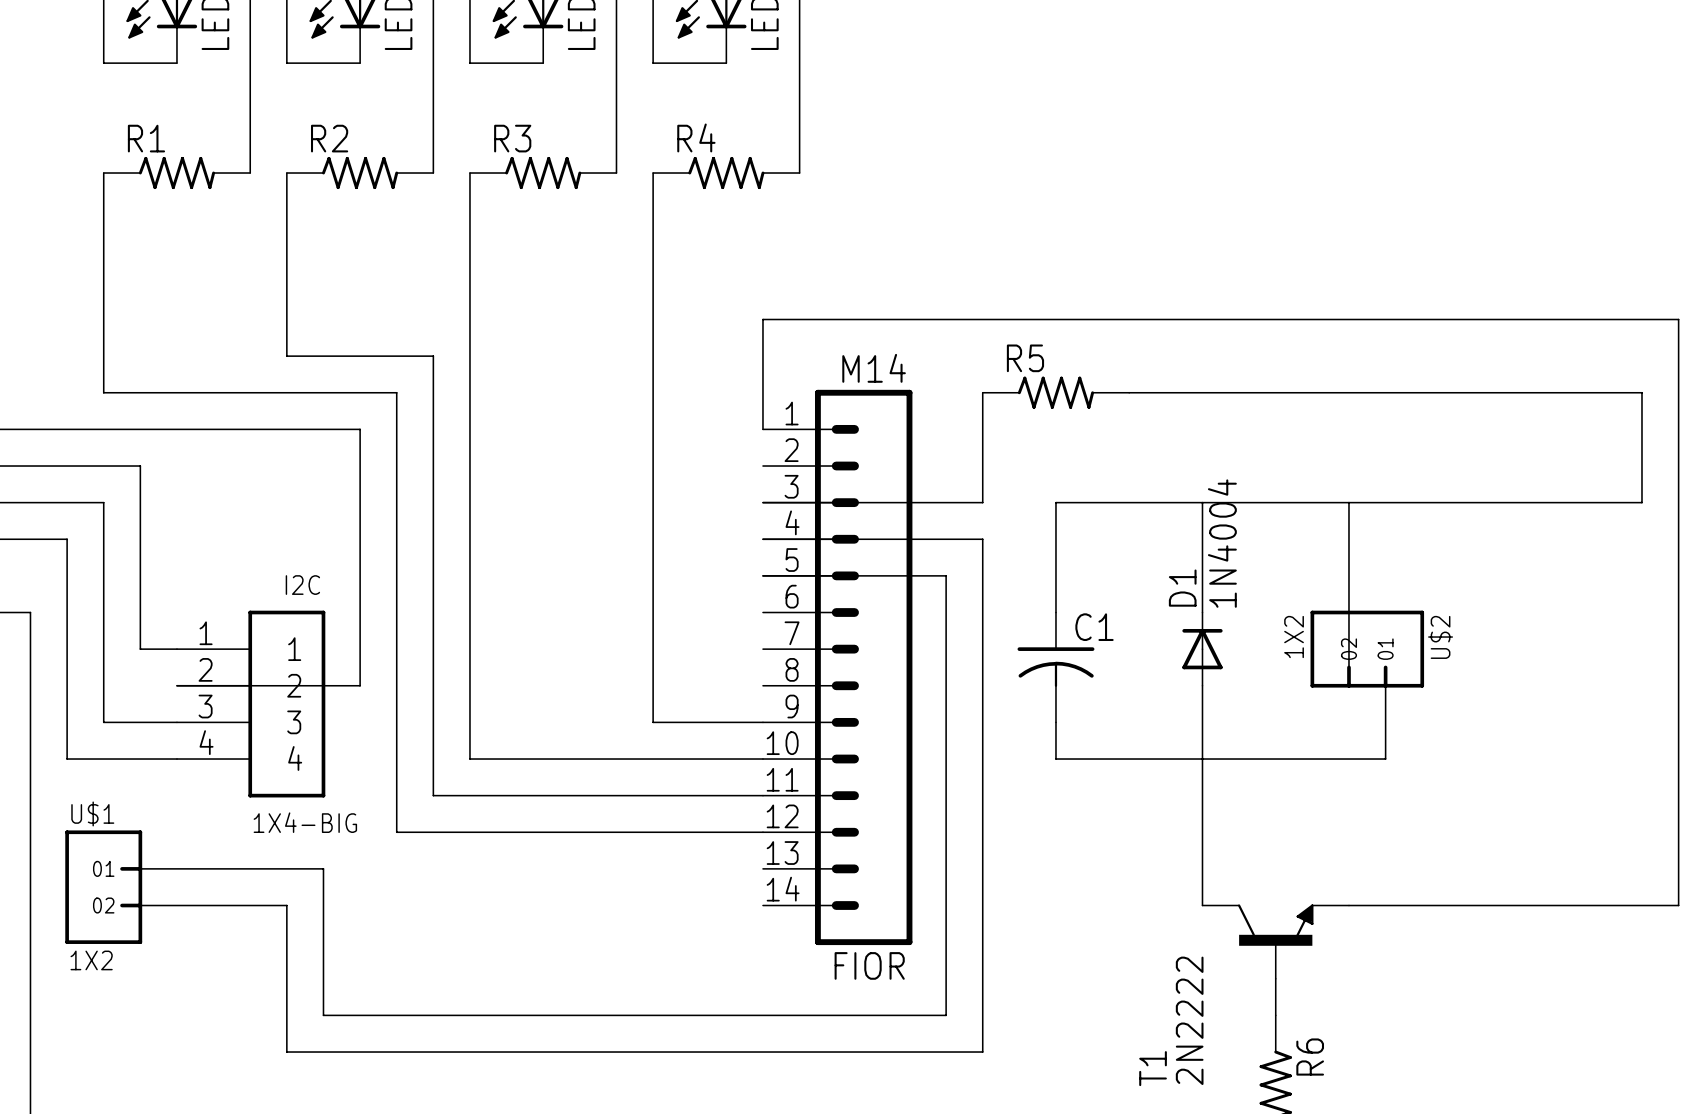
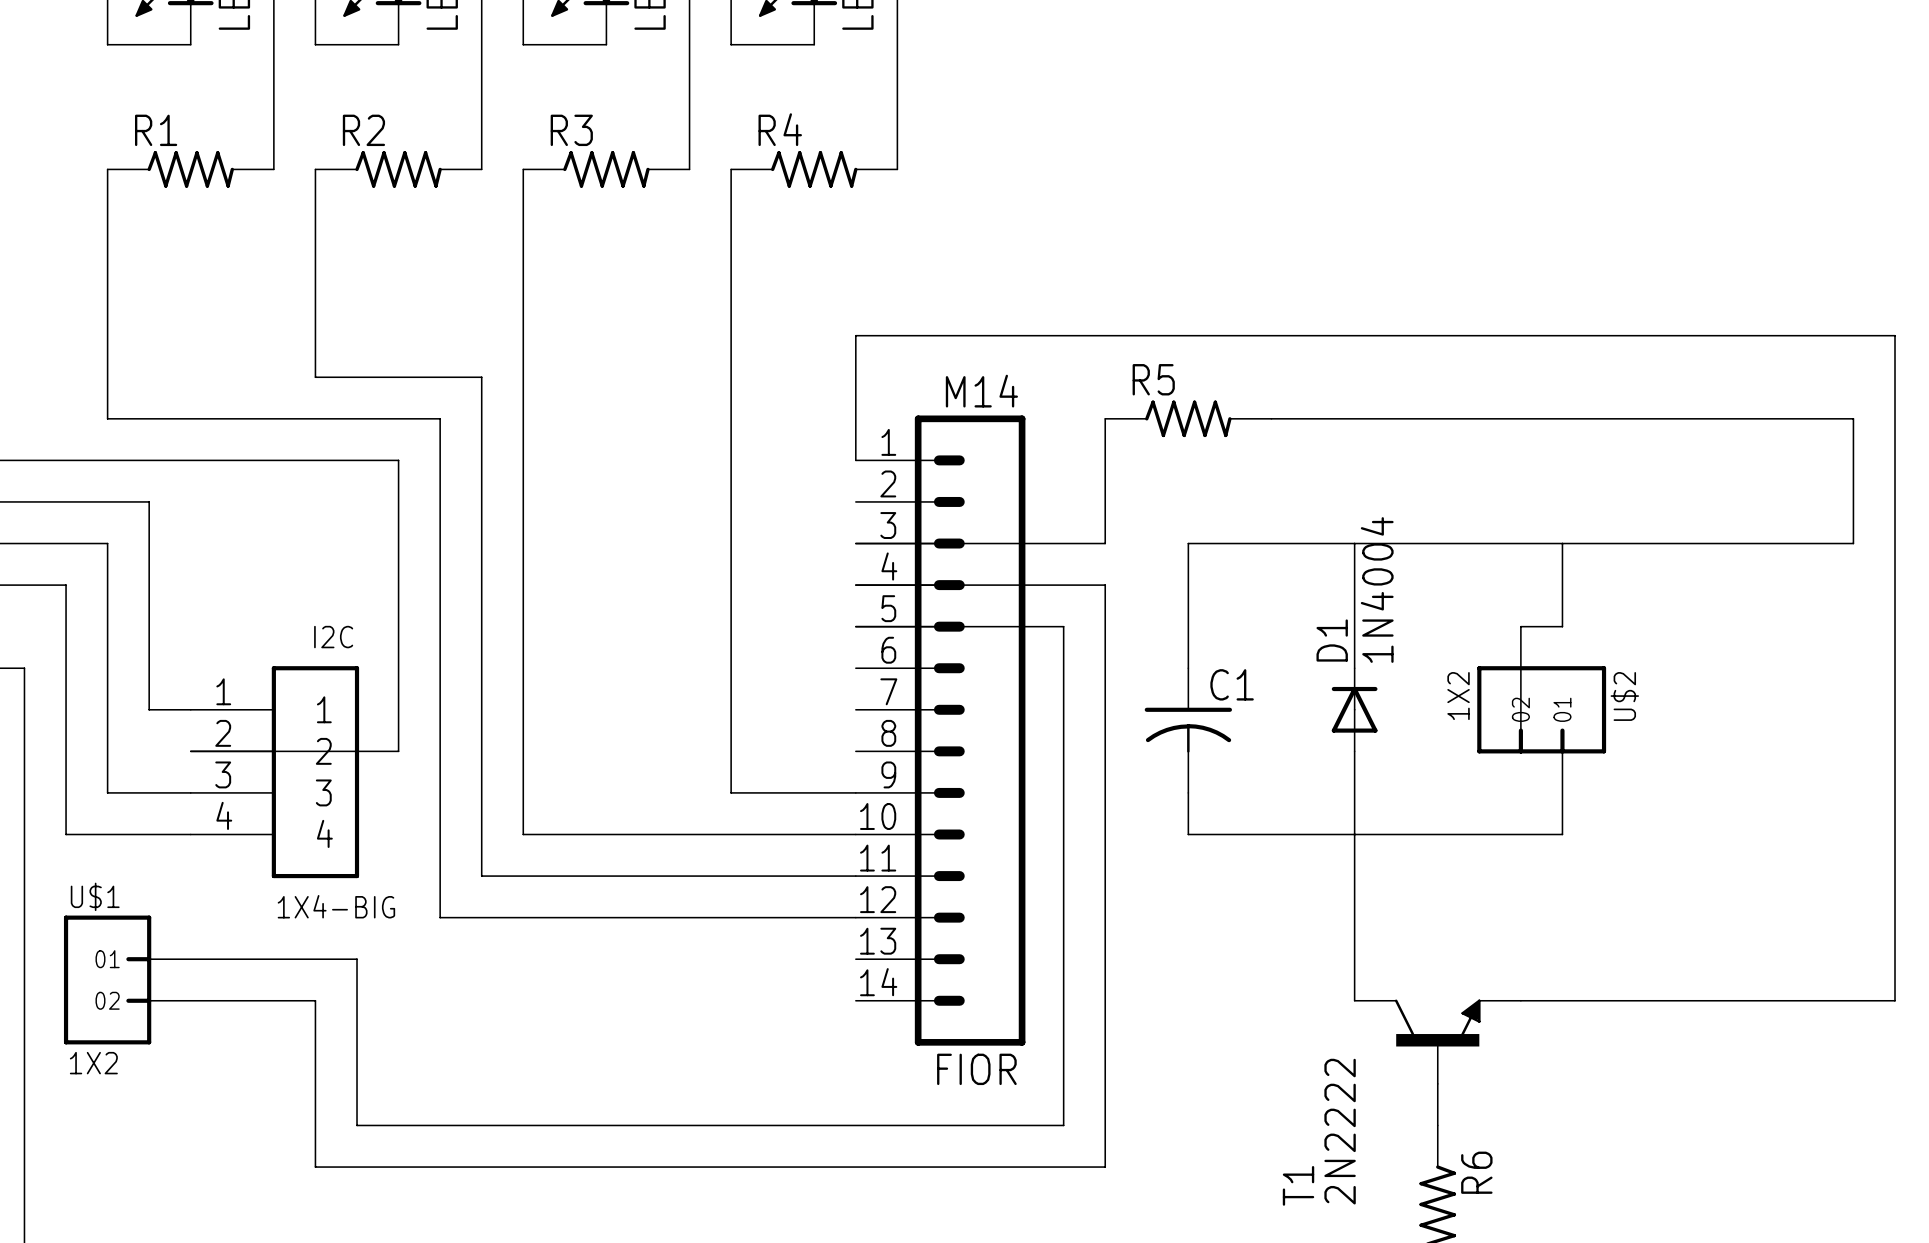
wire: (1348, 502) (1348, 575) -> (1562, 543) (1562, 626) (1520, 626)

